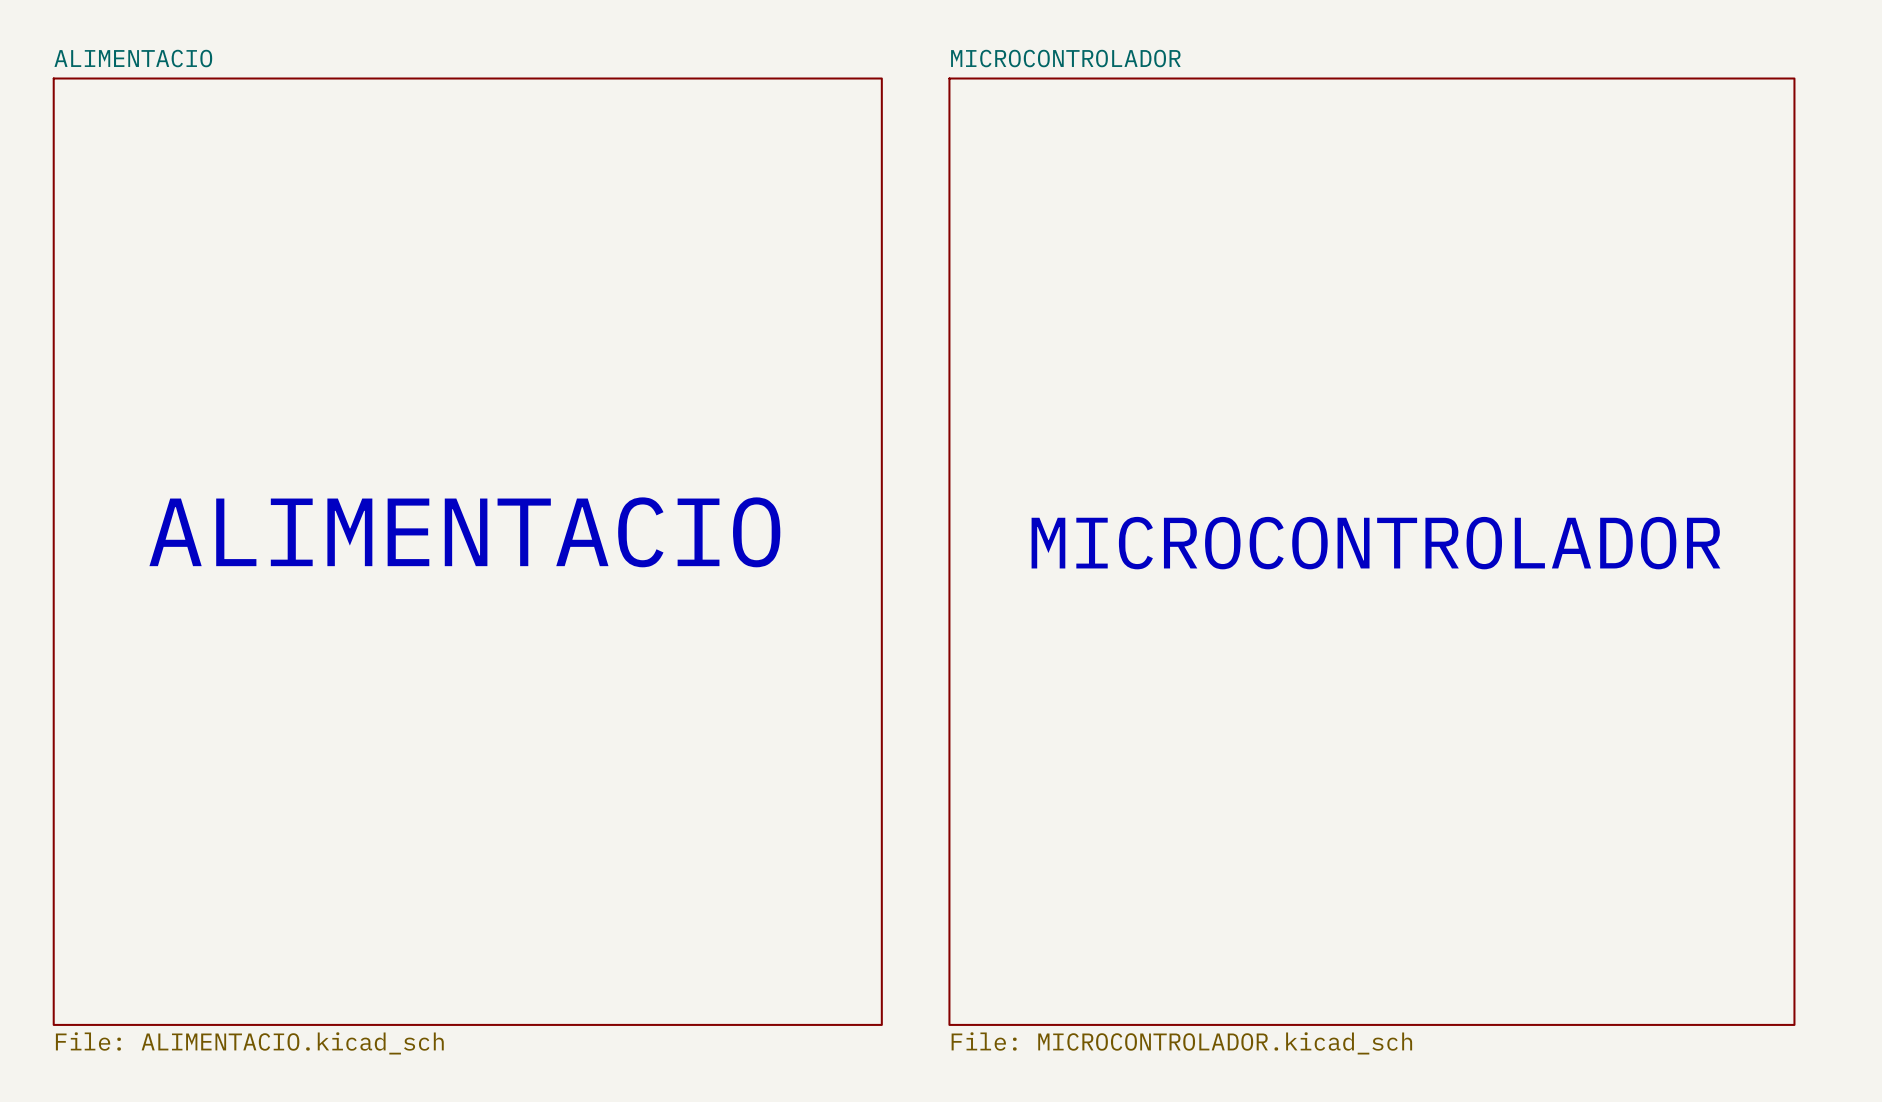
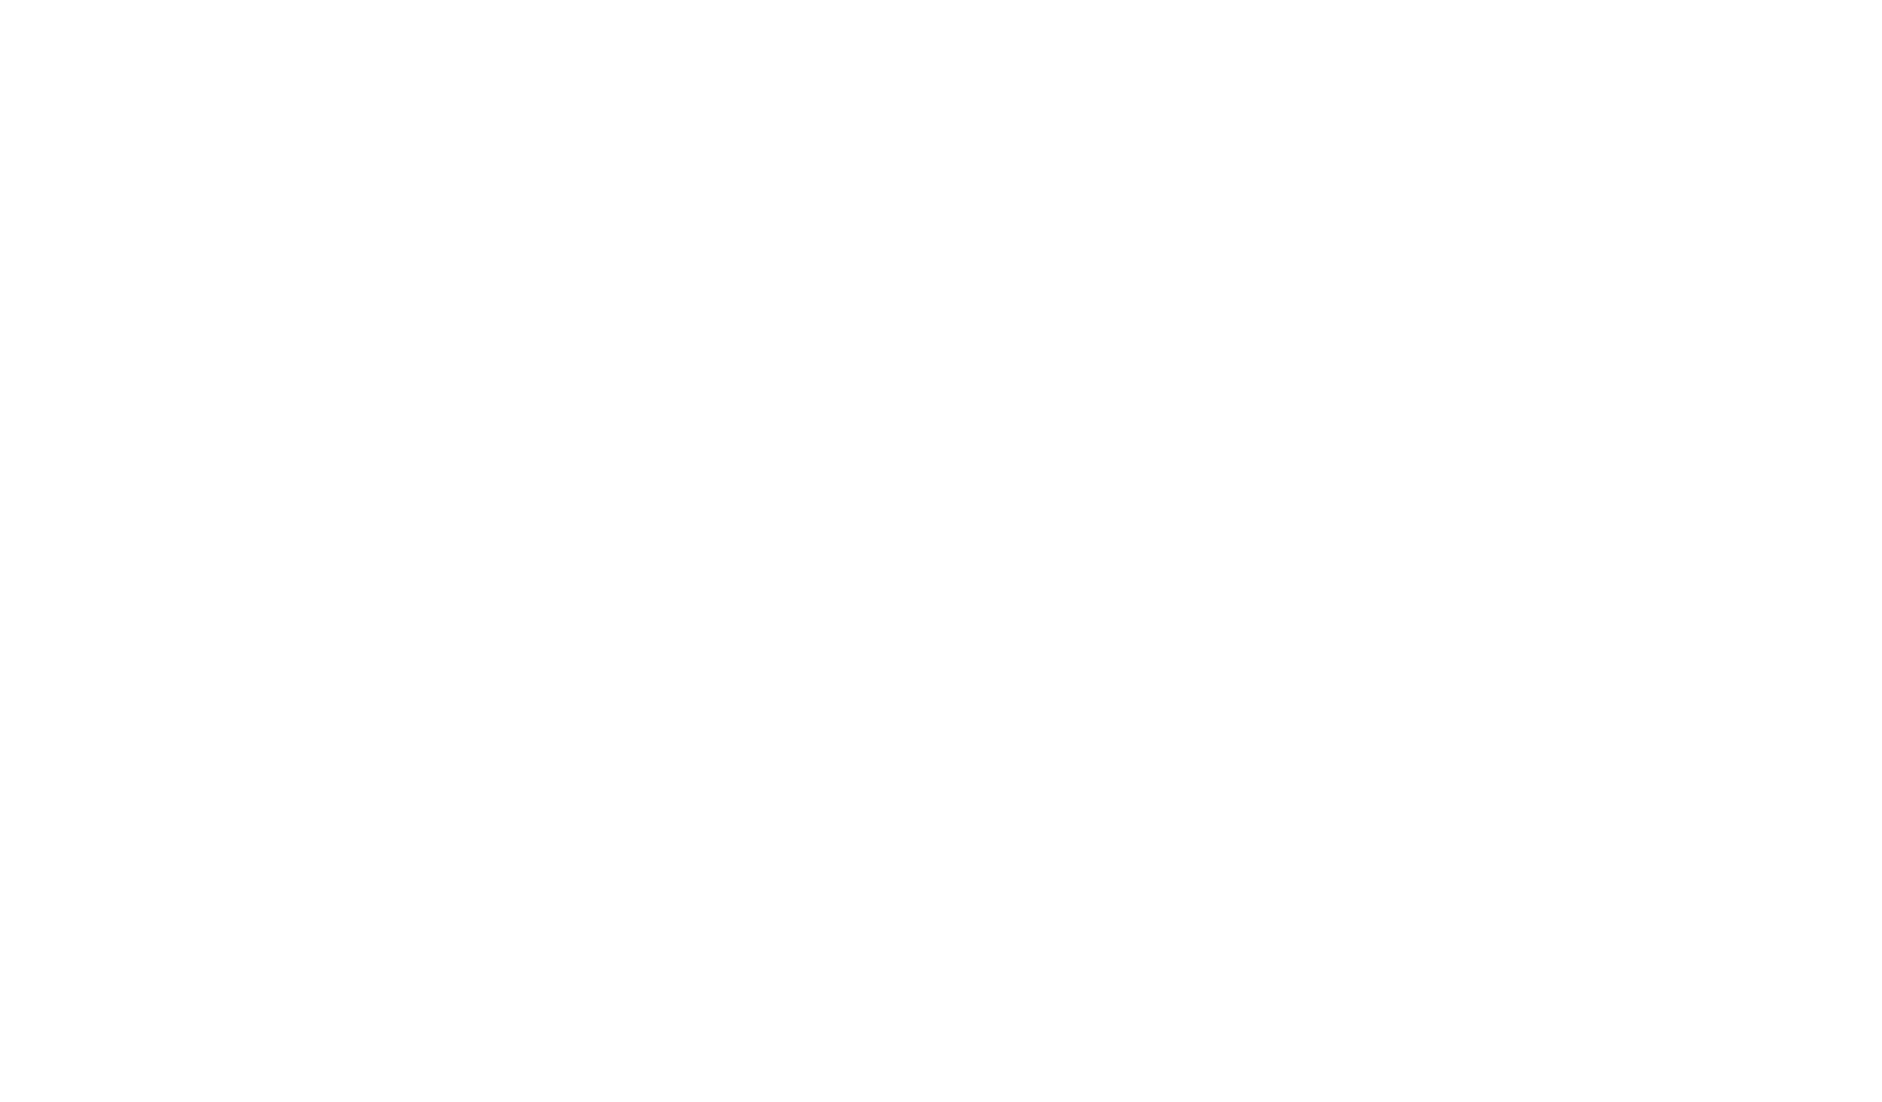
text: ALIMENTACIO (464, 532) -> none
text: MICROCONTROLADOR (1375, 543) -> none
sheet ALIMENTACIO: File: ALIMENTACIO.kicad_sch (467, 551) -> none
sheet MICROCONTROLADOR: File: MICROCONTROLADOR.kicad_sch (1371, 551) -> none

